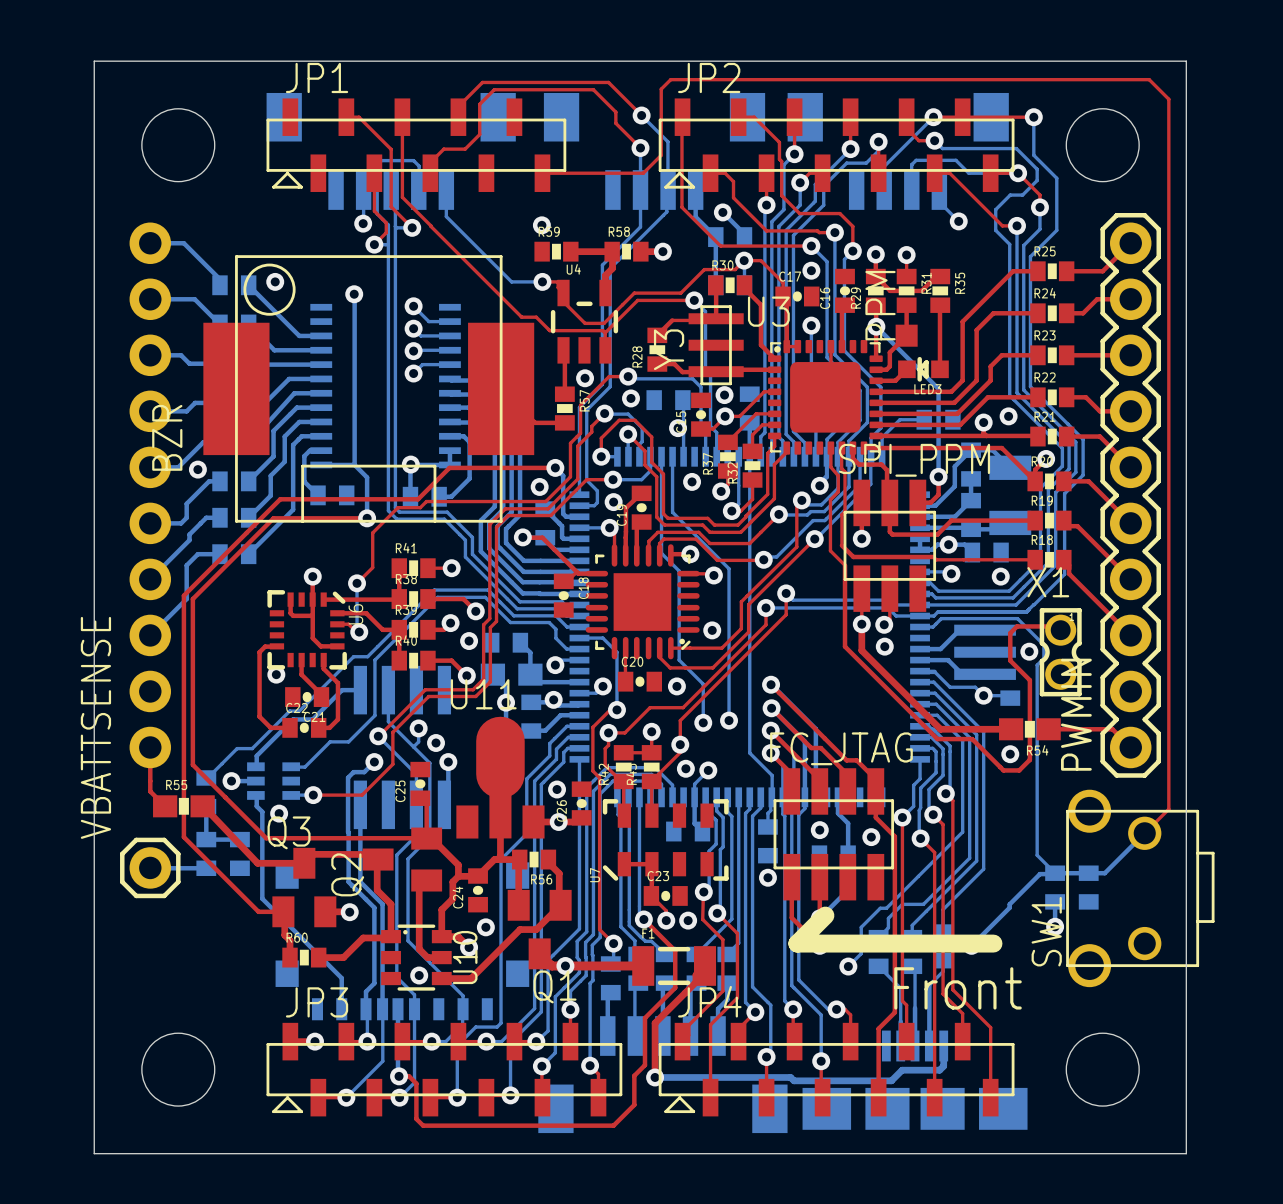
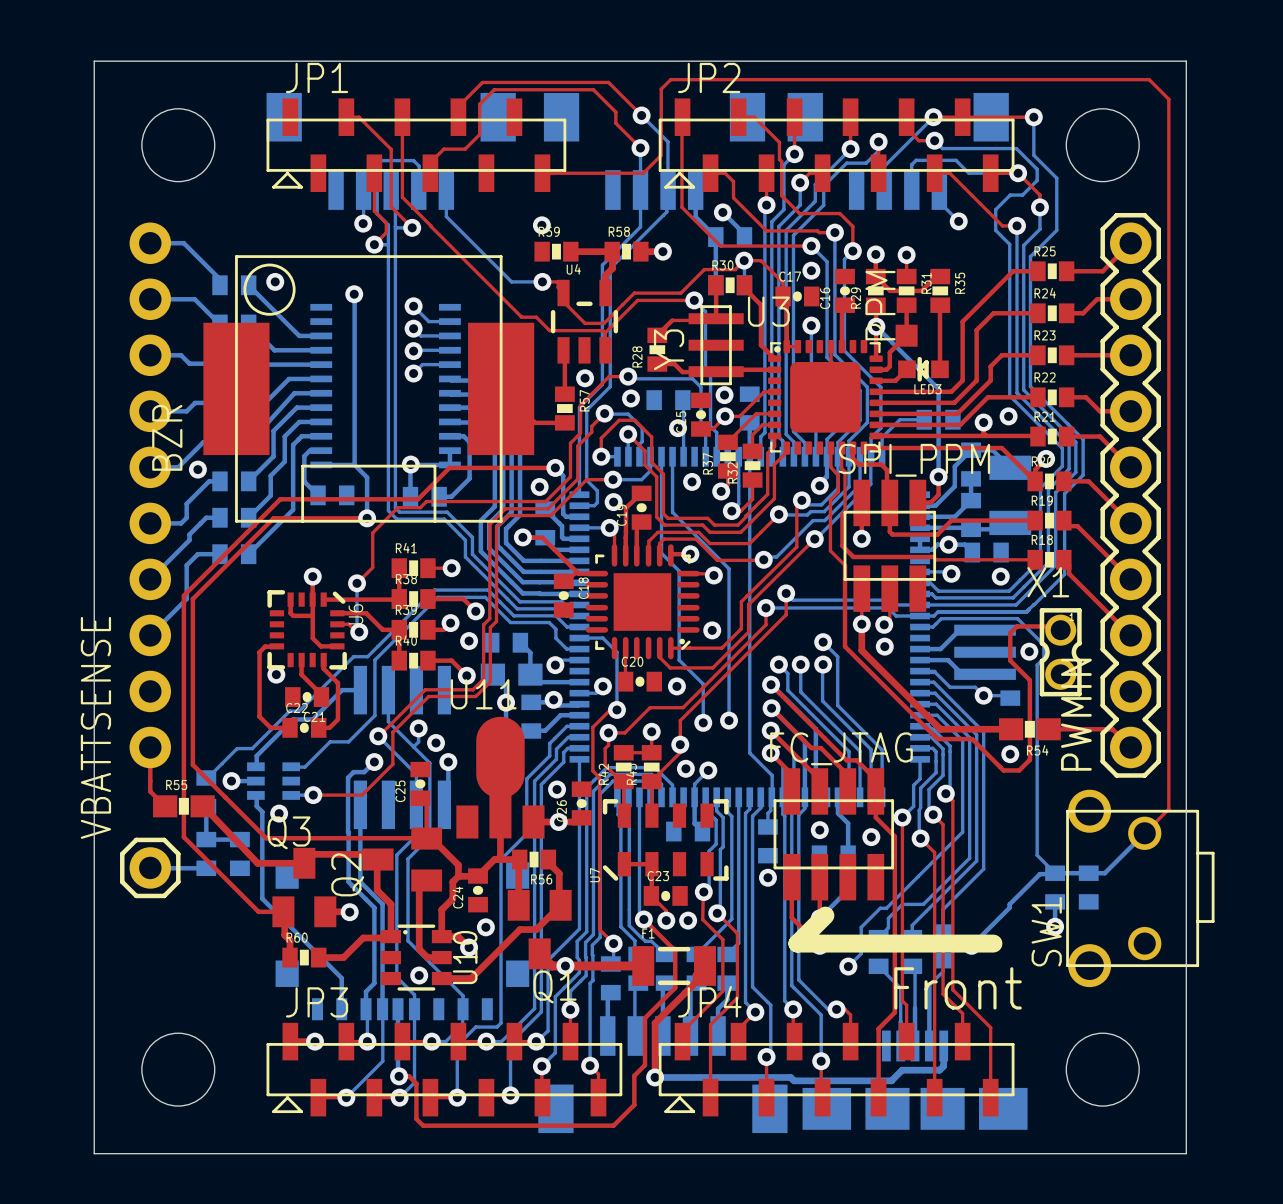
bottom track: none -> (823, 642) (837, 656) (837, 705) (882, 749) (882, 797)
via: none -> (823, 642)
bottom track: none -> (778, 664) (787, 673) (787, 690) (849, 751) (849, 797)
via: none -> (778, 664)
bottom track: none -> (800, 664) (800, 692) (860, 751) (860, 797)
via: none -> (800, 664)
bottom track: none -> (823, 664) (822, 700) (871, 749) (871, 797)
via: none -> (823, 664)

